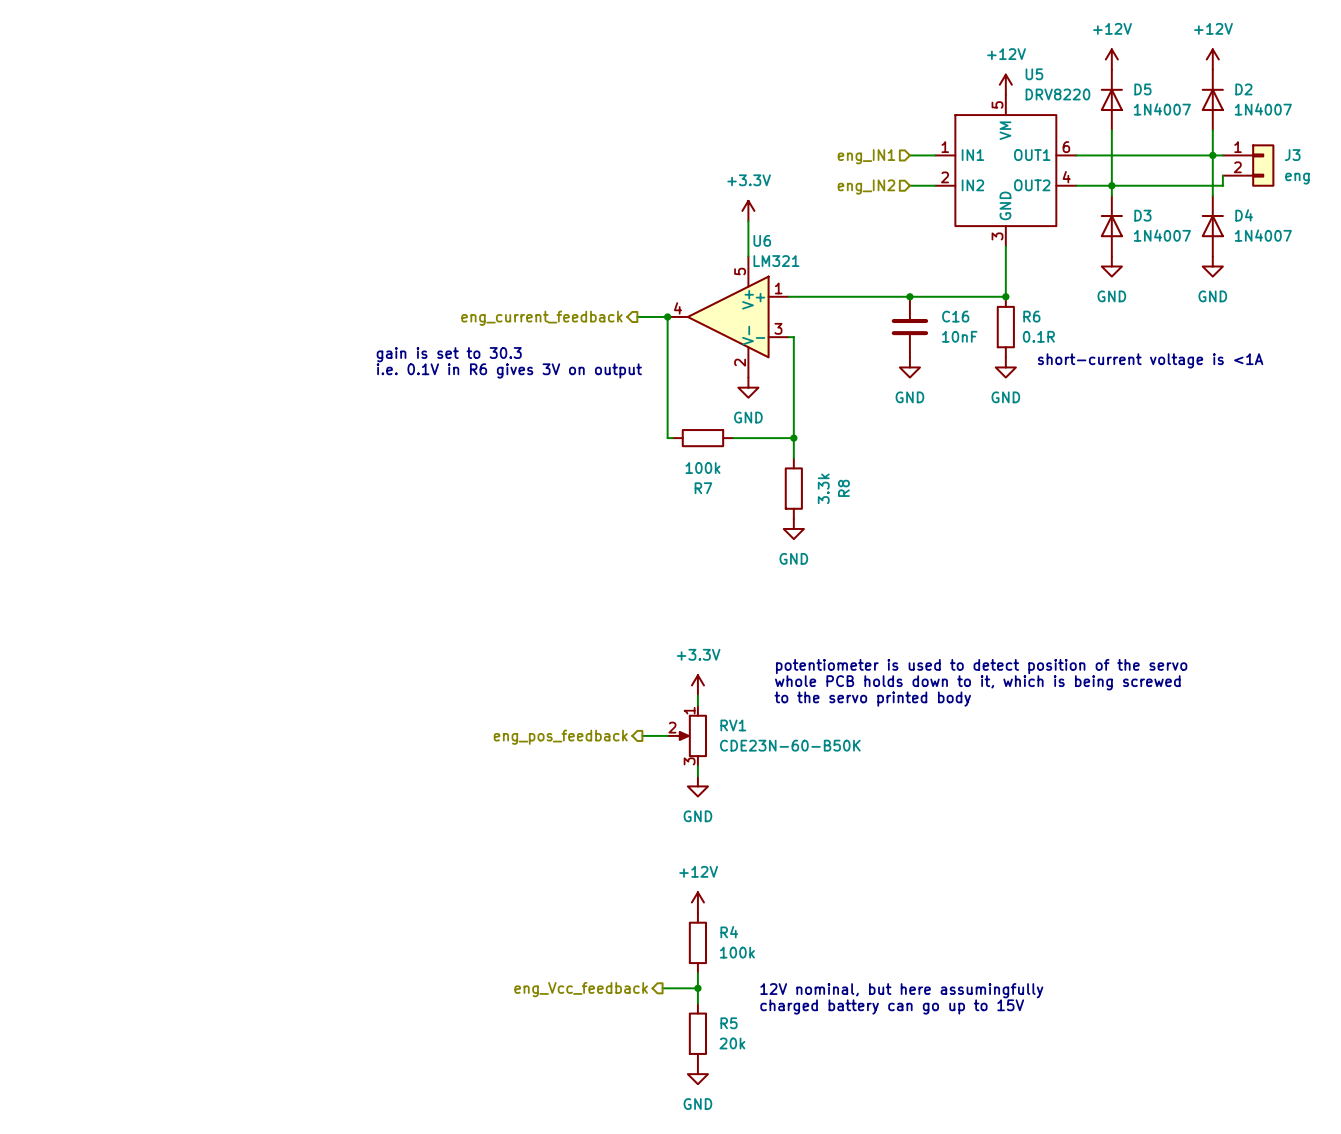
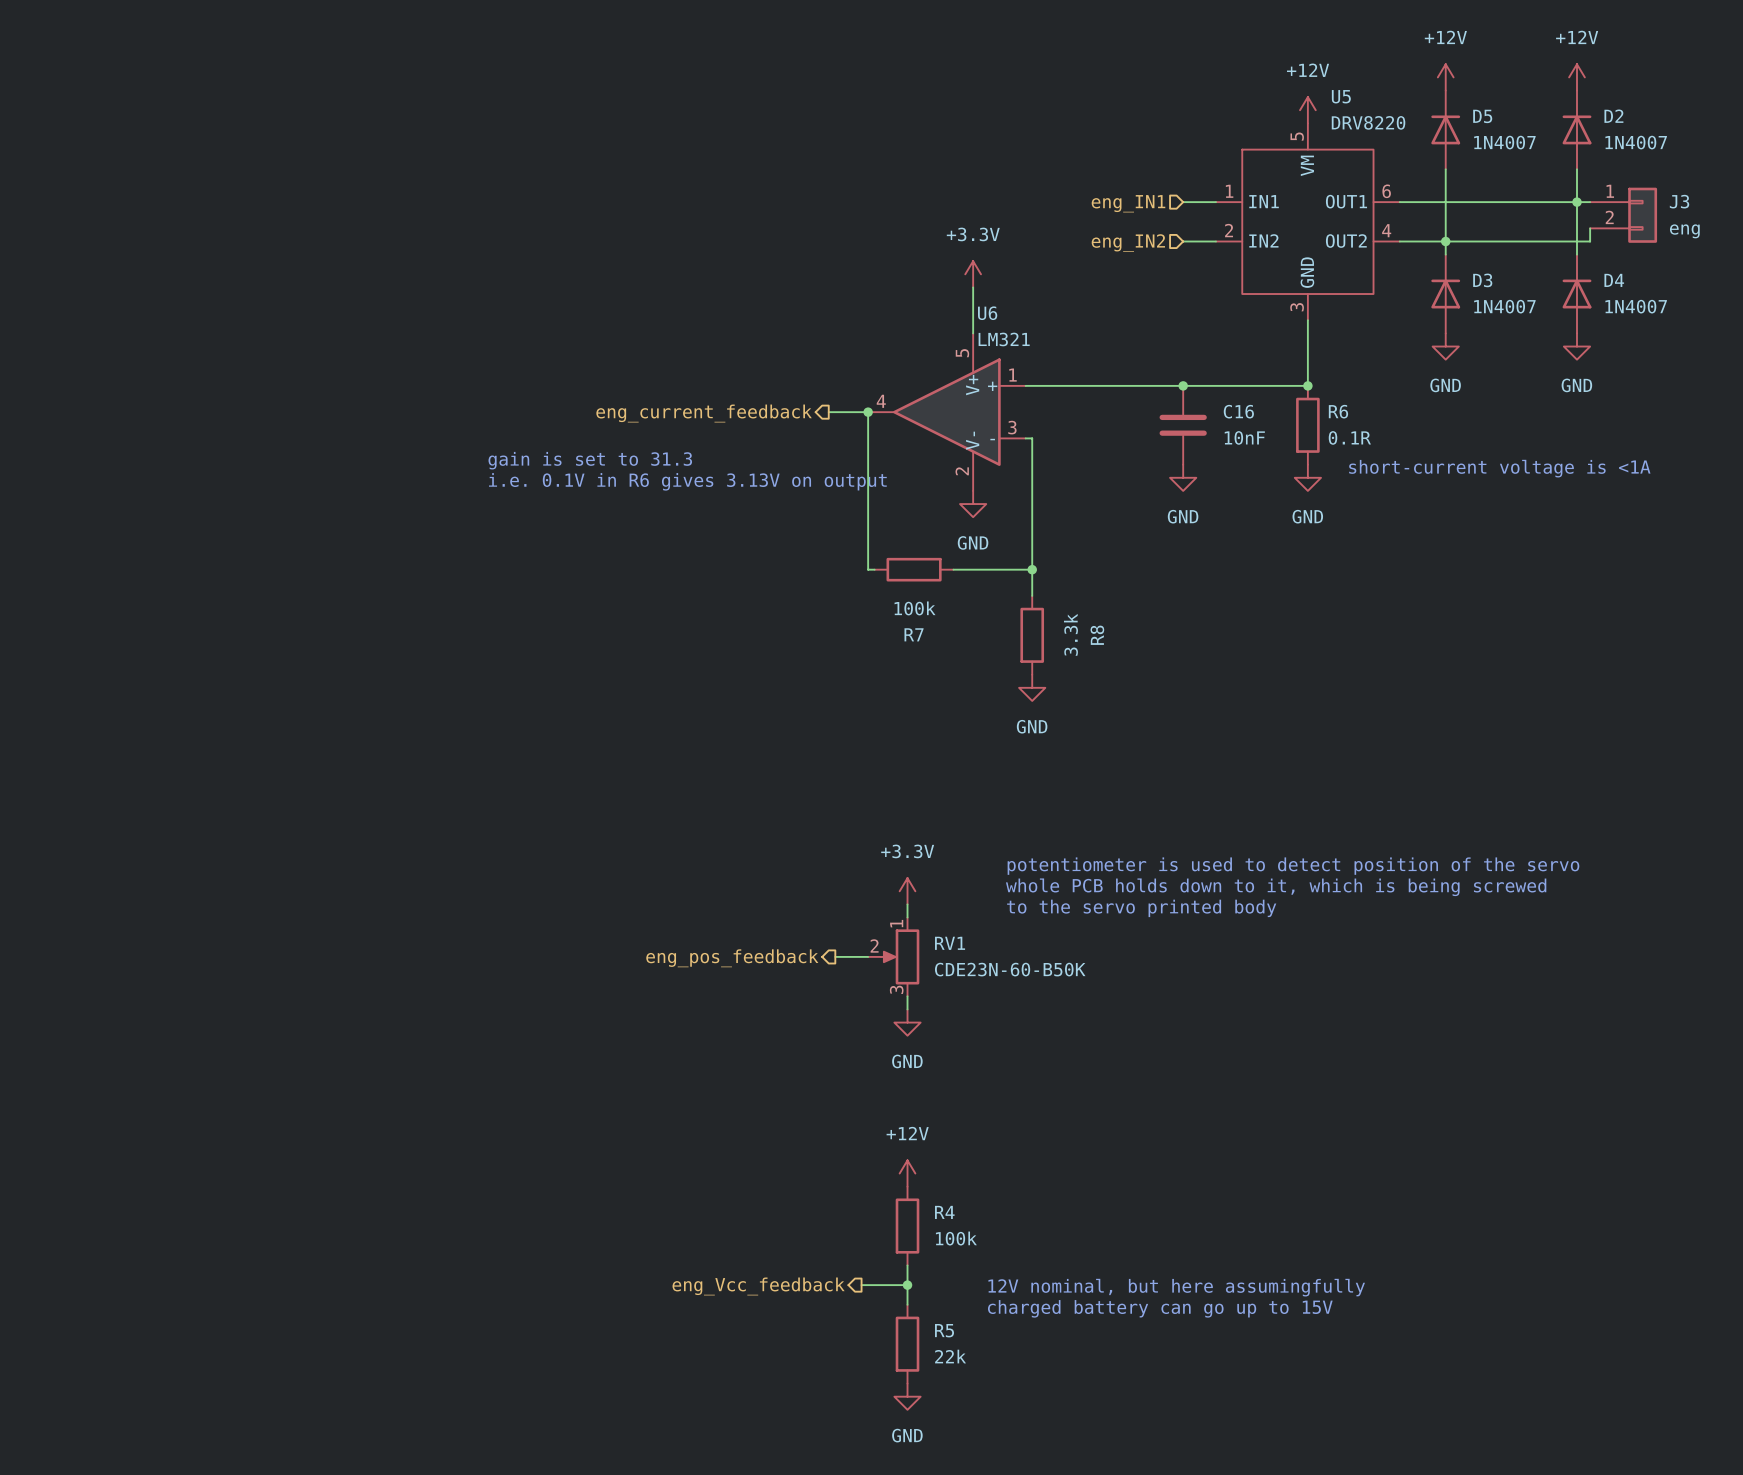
text: gain is set to 30.3 (449, 354) -> gain is set to 31.3 (590, 460)
text: i.e. 0.1V in R6 gives 3V on output (509, 370) -> i.e. 0.1V in R6 gives 3.13V on output (687, 481)
R5 value: 20k (732, 1043) -> 22k (950, 1356)

